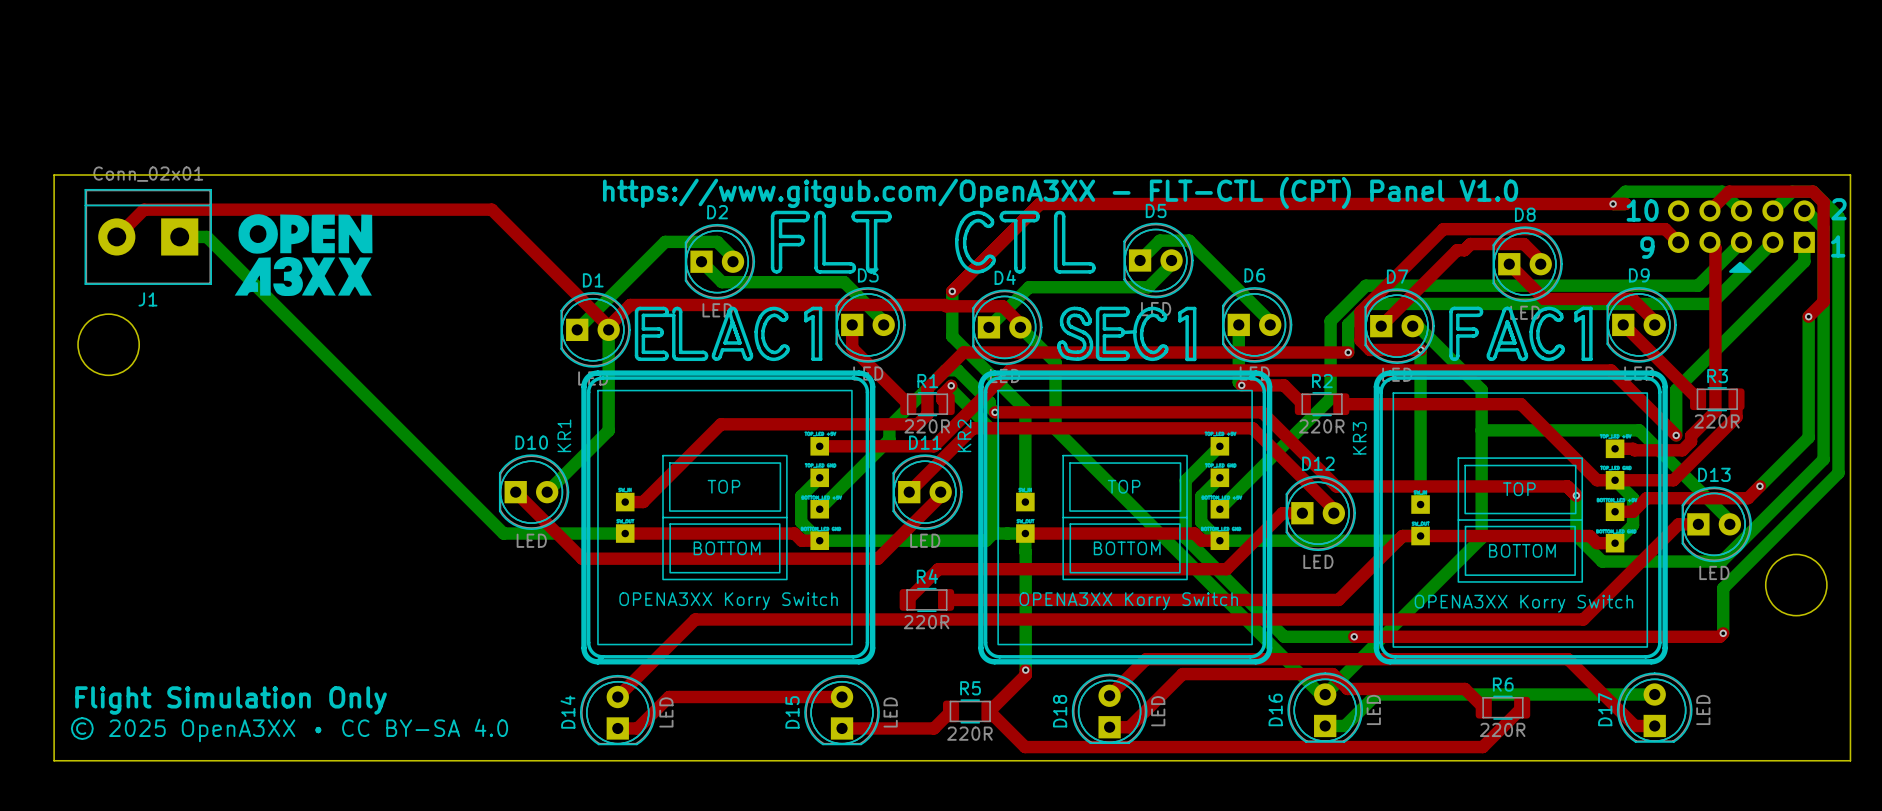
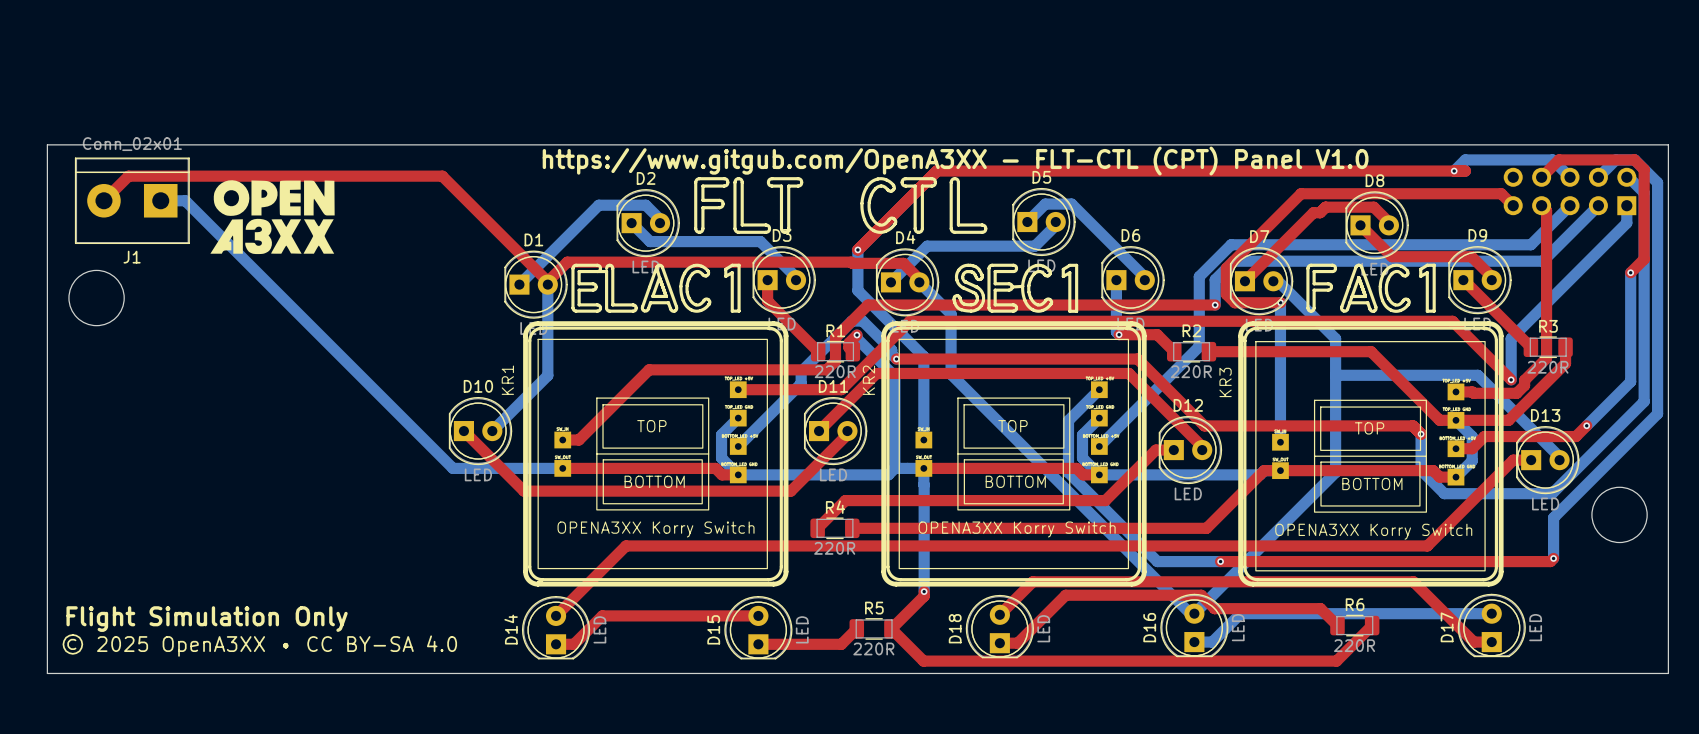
text: 2 (1839, 209) -> none
text: 10 (1642, 210) -> none
text: 1 (1838, 246) -> none
text: 9 (1647, 247) -> none
drawing: [1729, 261, 1752, 273] -> none

